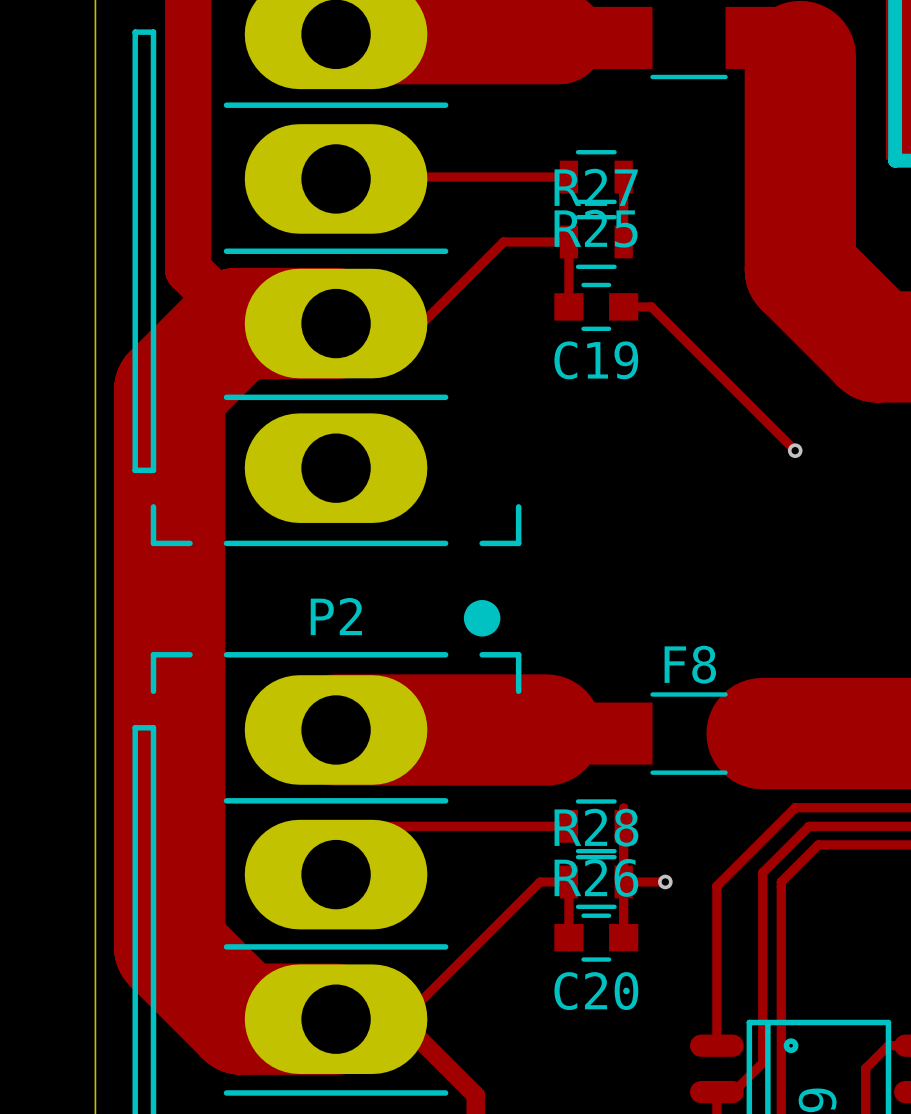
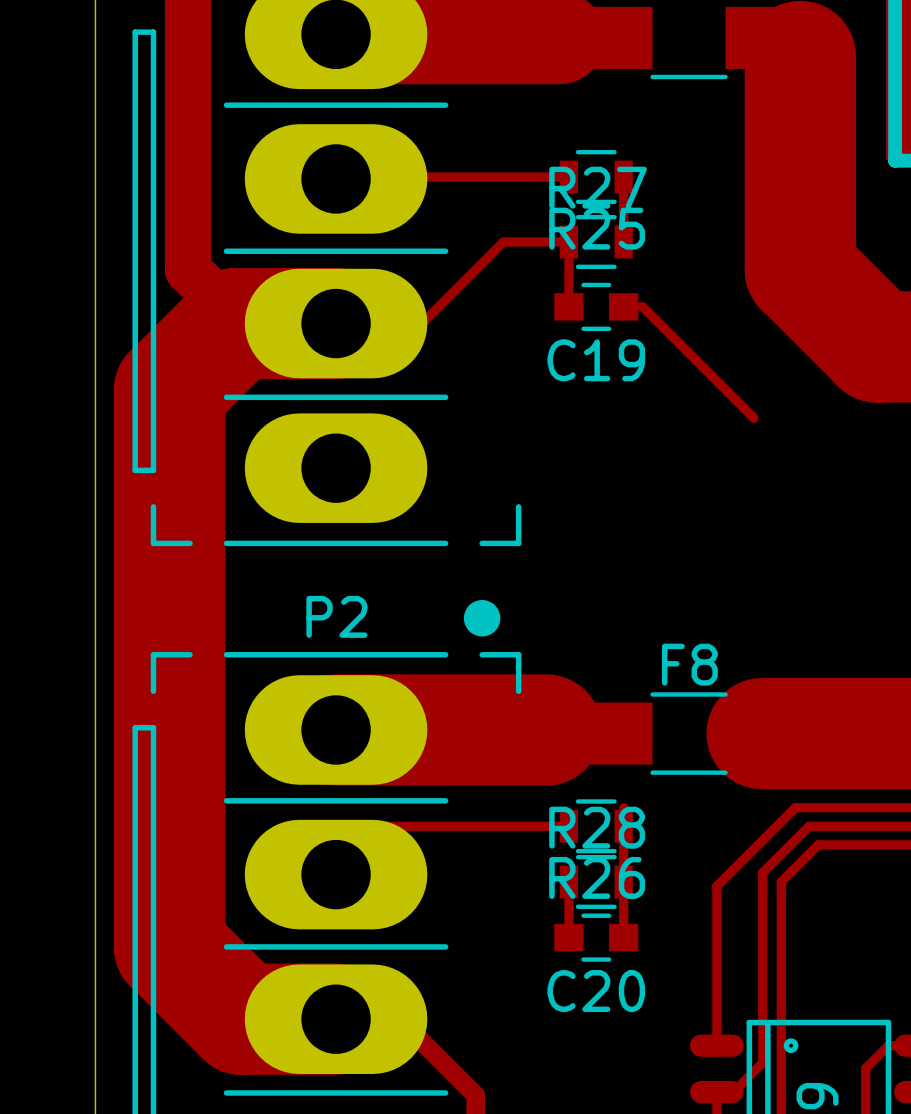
track: (642, 306) (651, 306) (795, 450) -> (642, 306) (753, 418)
via: (795, 450) -> none
track: (568, 881) (540, 881) (402, 1019) (336, 1019) -> none
track: (623, 881) (665, 881) -> none
via: (665, 881) -> none

